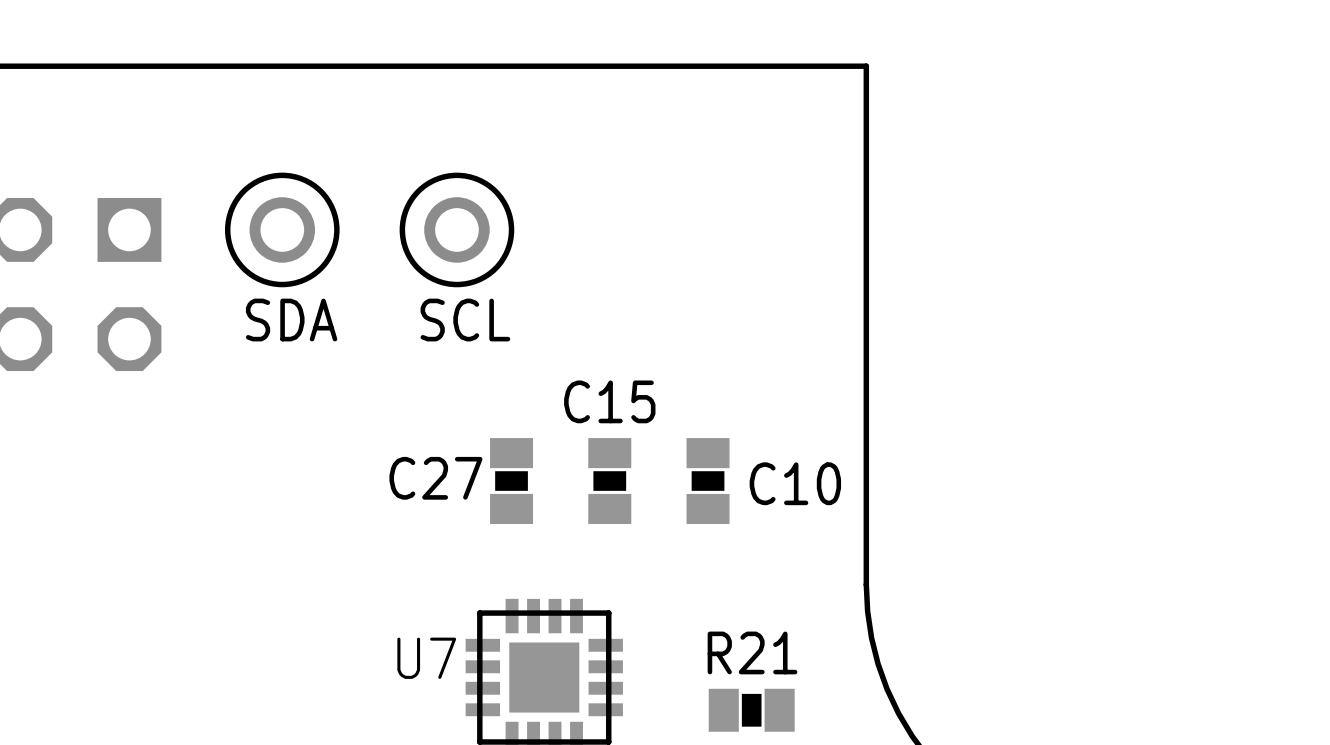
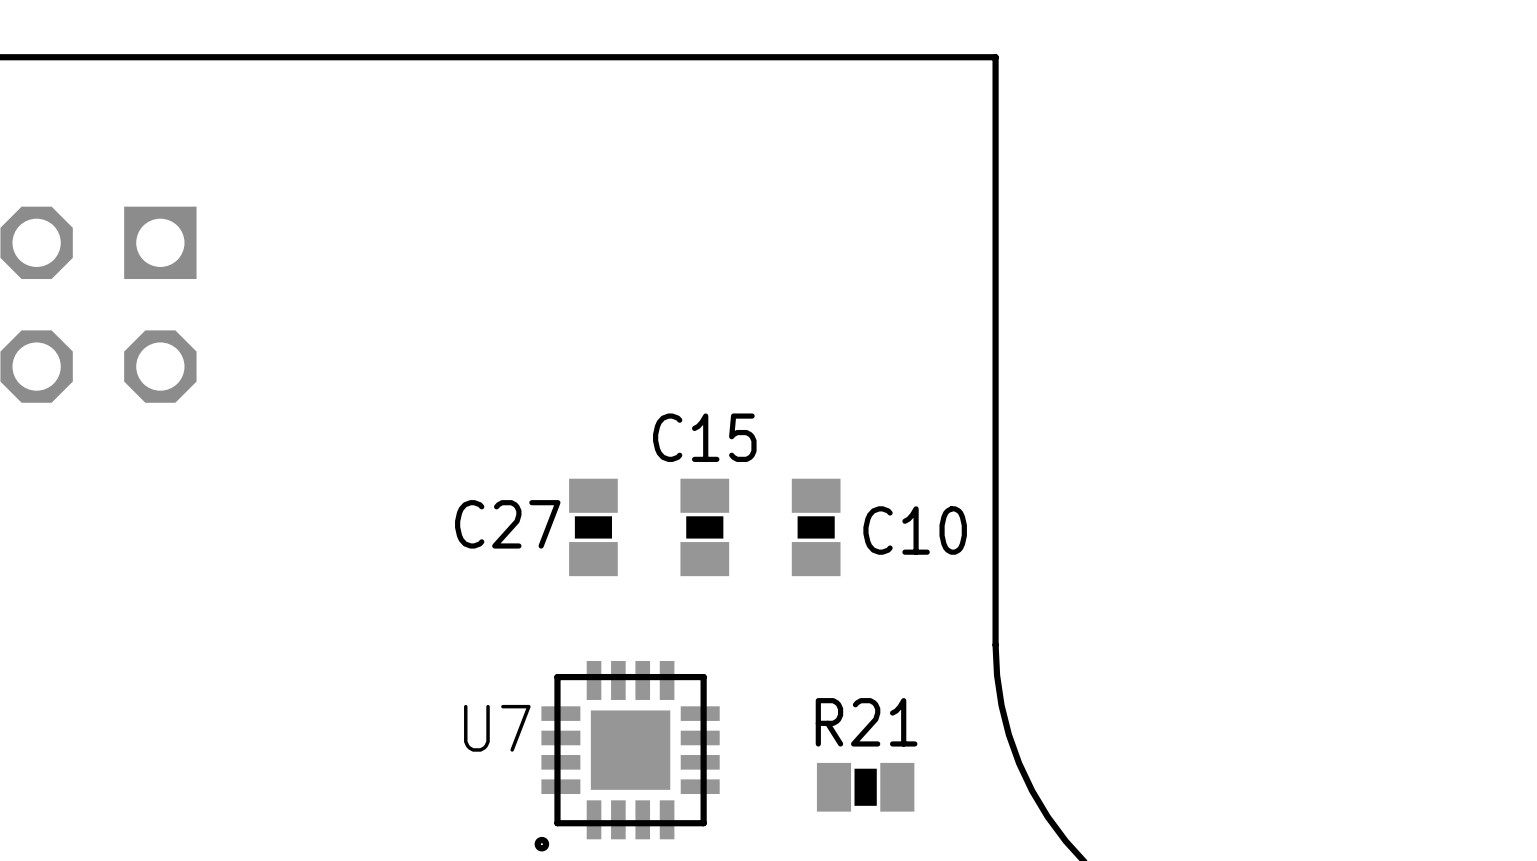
part: (282, 229) -> none
part: (456, 229) -> none
text: SDA (291, 320) -> none
text: SCL (465, 320) -> none

